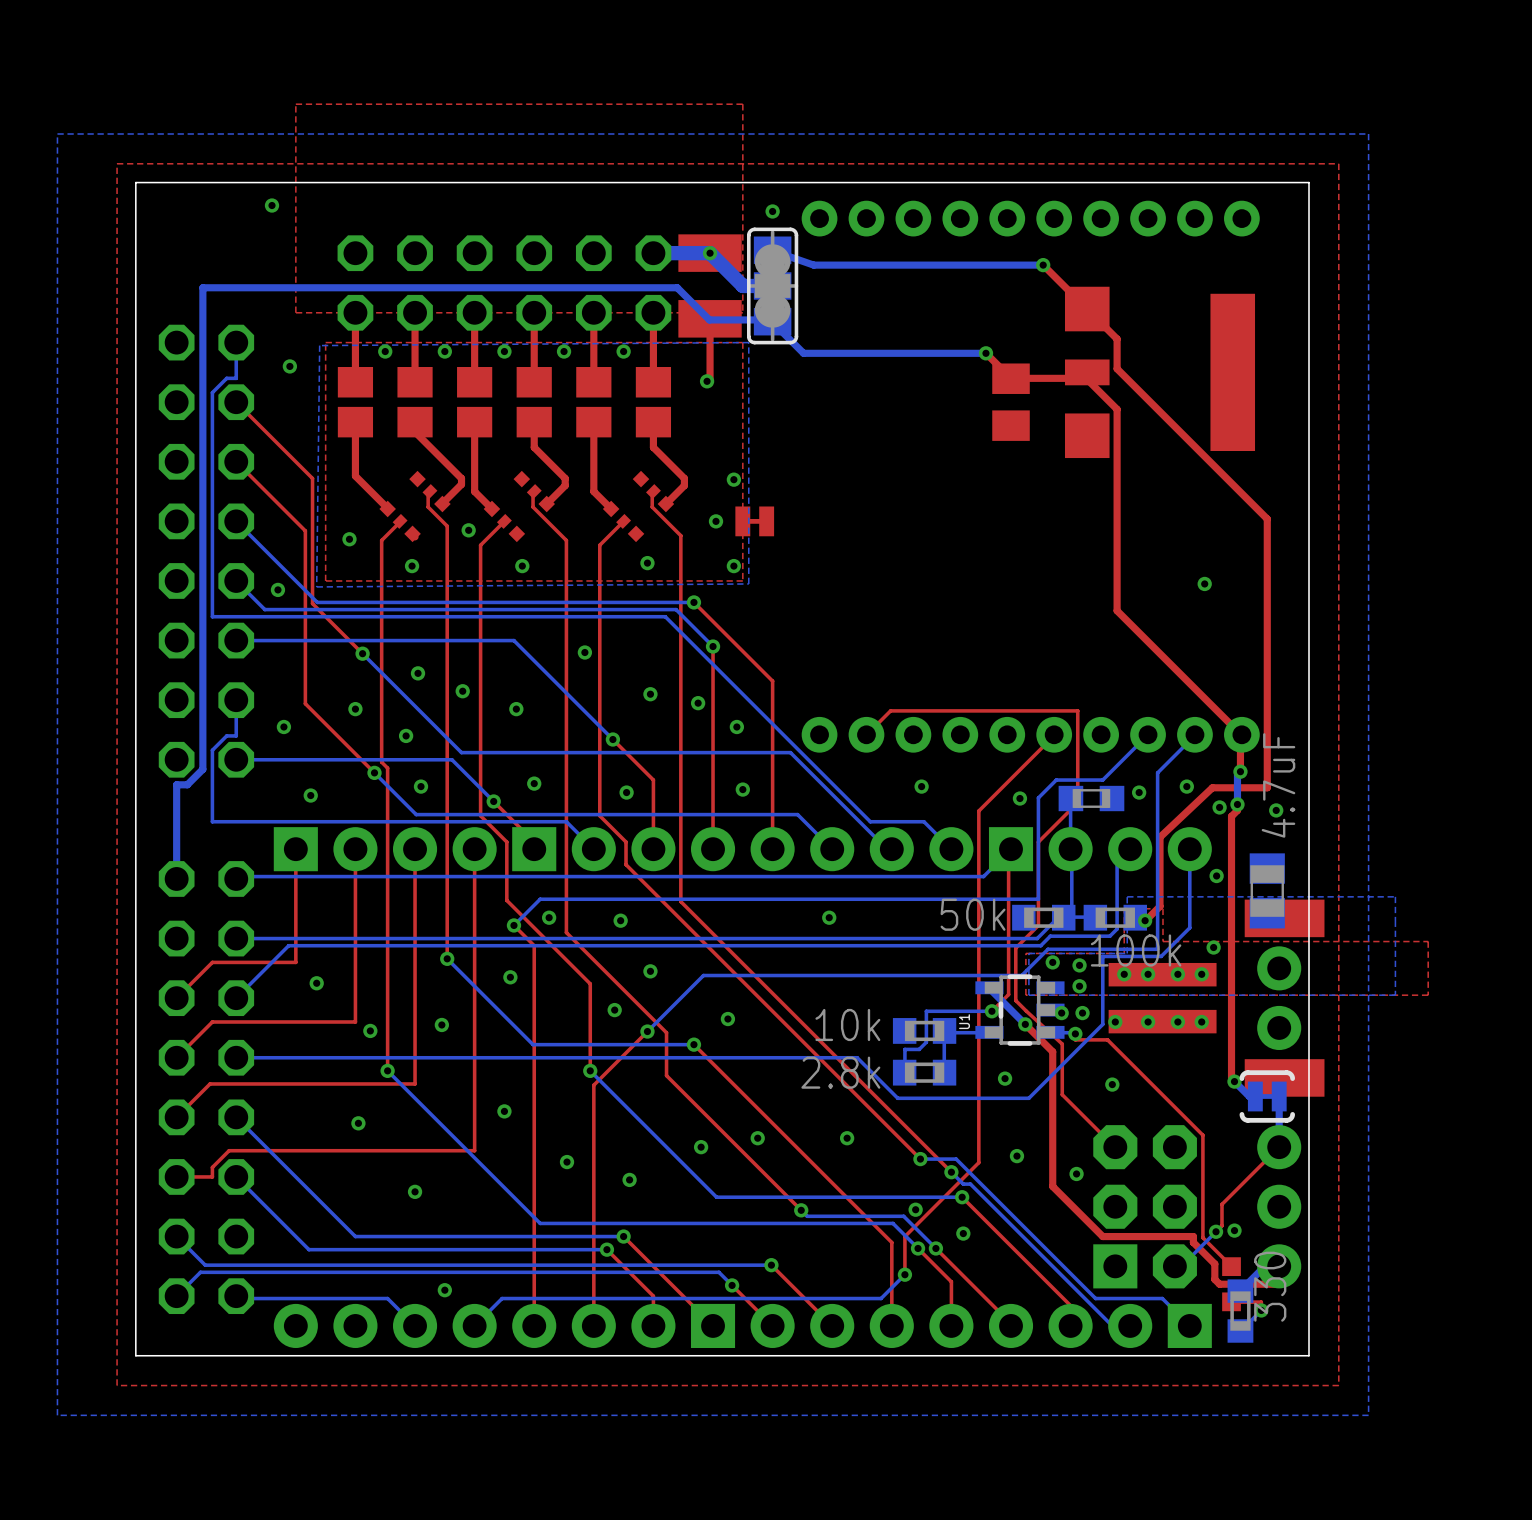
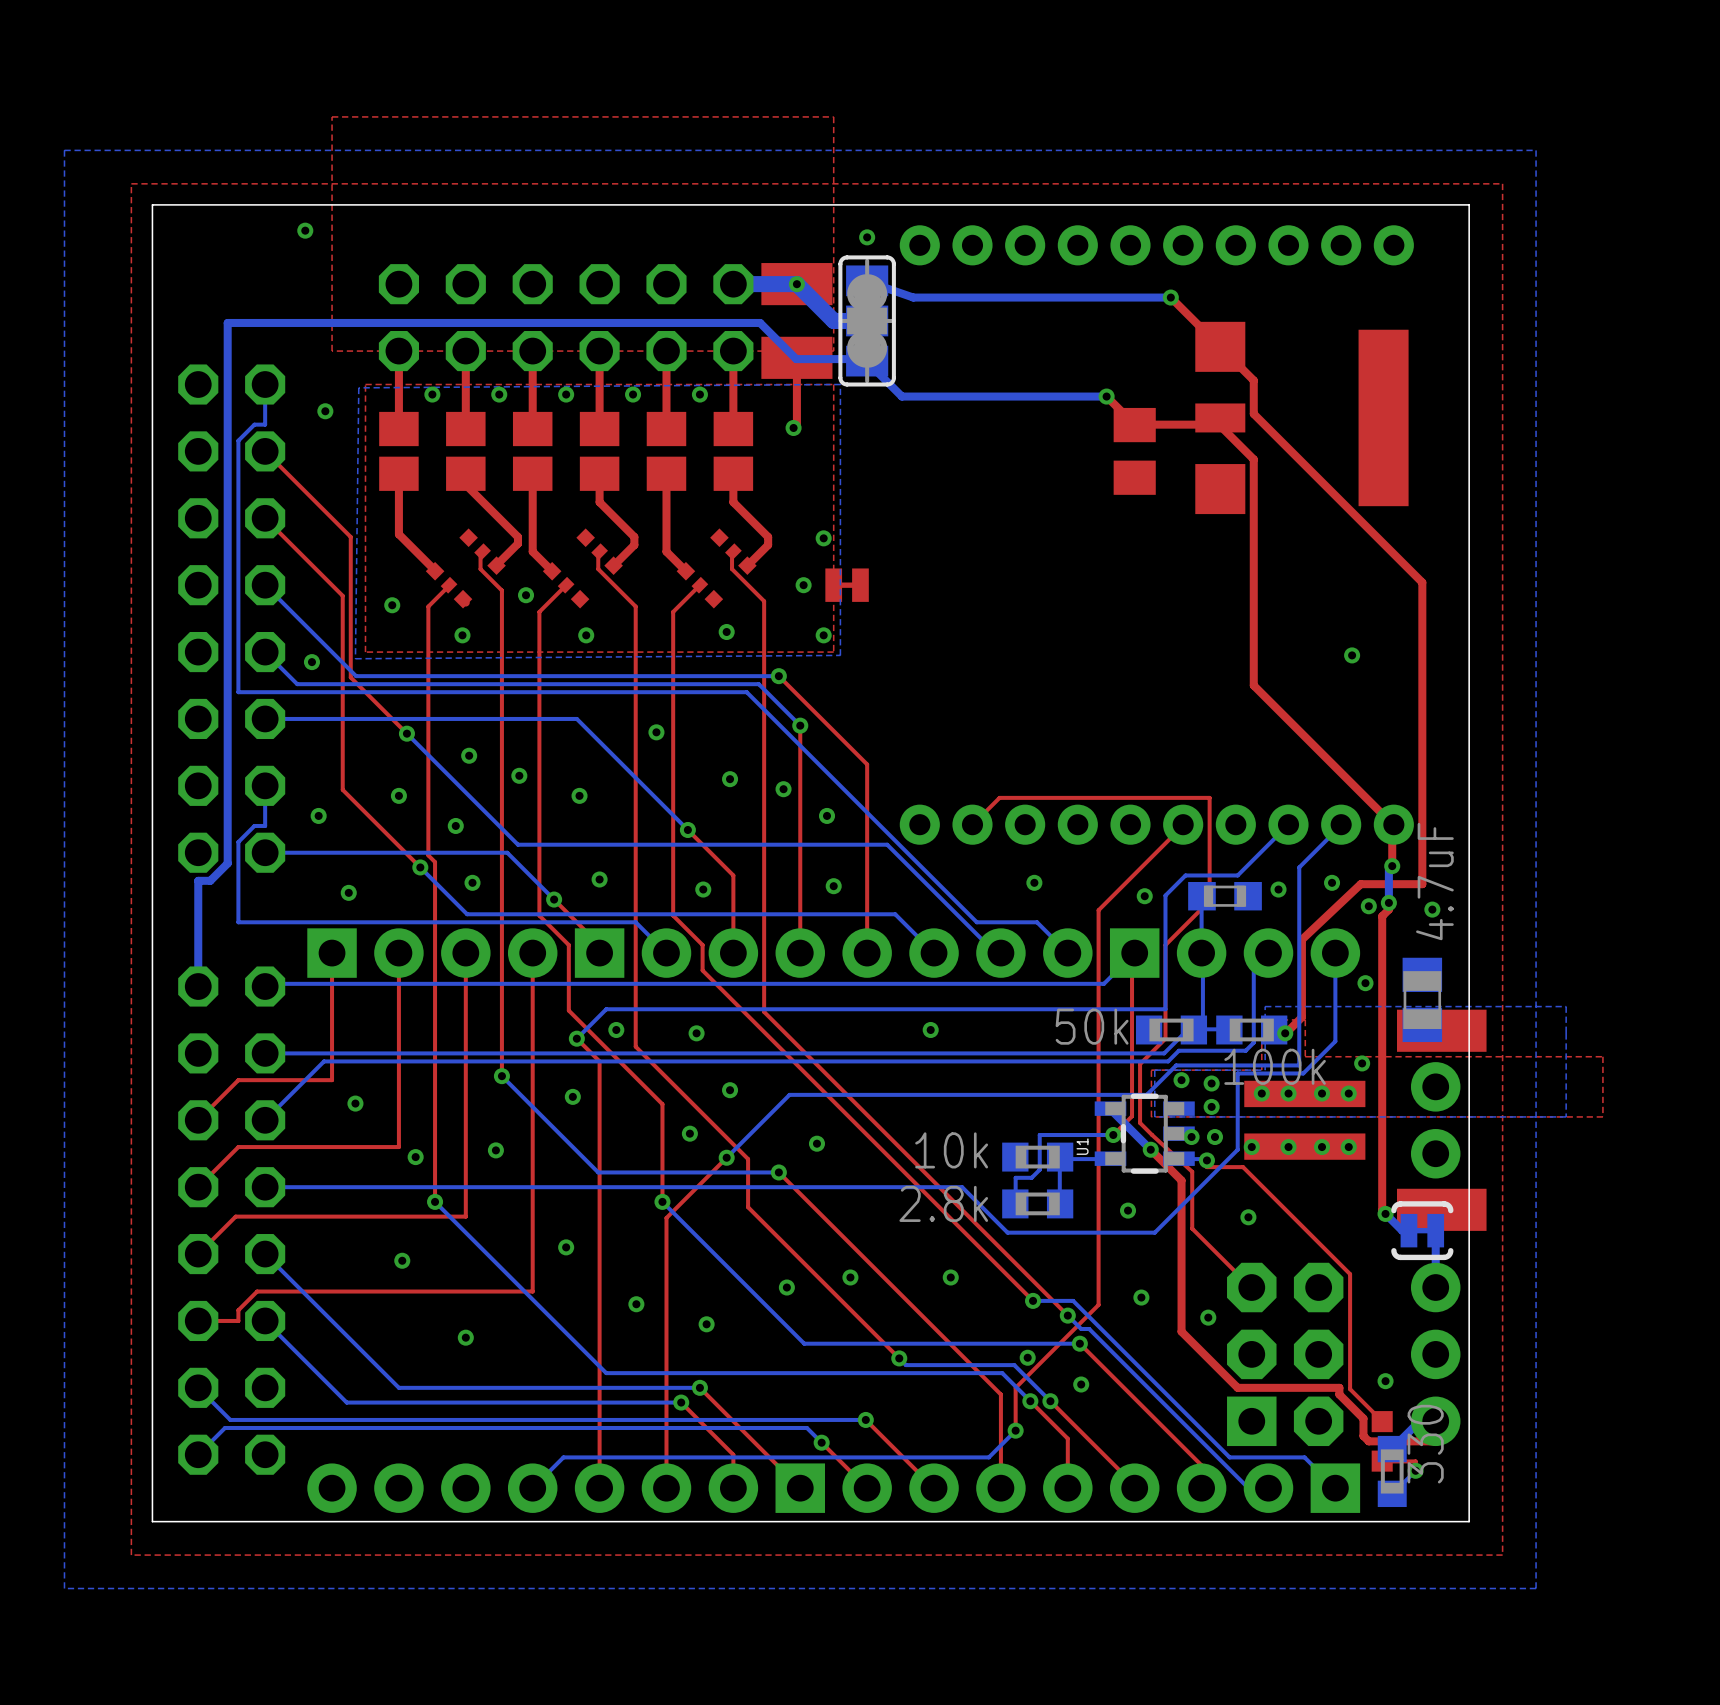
top track: (1279, 1147) (1221, 1204) (1221, 1225) (1216, 1231) -> none
bottom track: (1216, 1231) (1192, 1255) (1186, 1255) (1174, 1266) -> none
via: (1216, 1231) -> none
via: (444, 1290) -> none
bottom track: (236, 1296) (238, 1298) (387, 1298) (415, 1325) -> none

